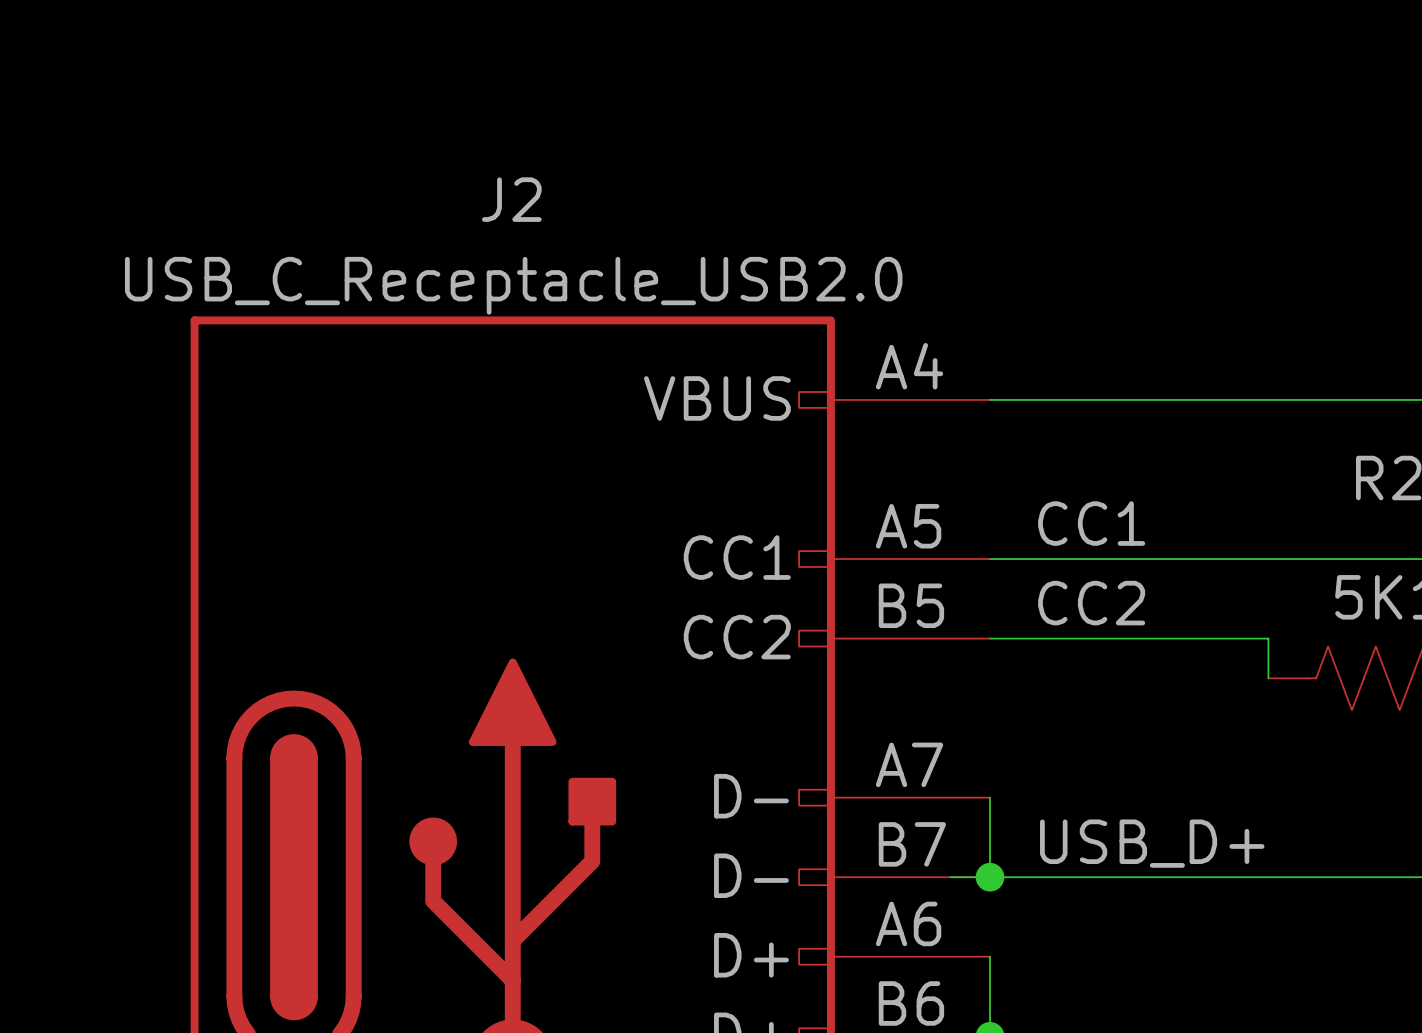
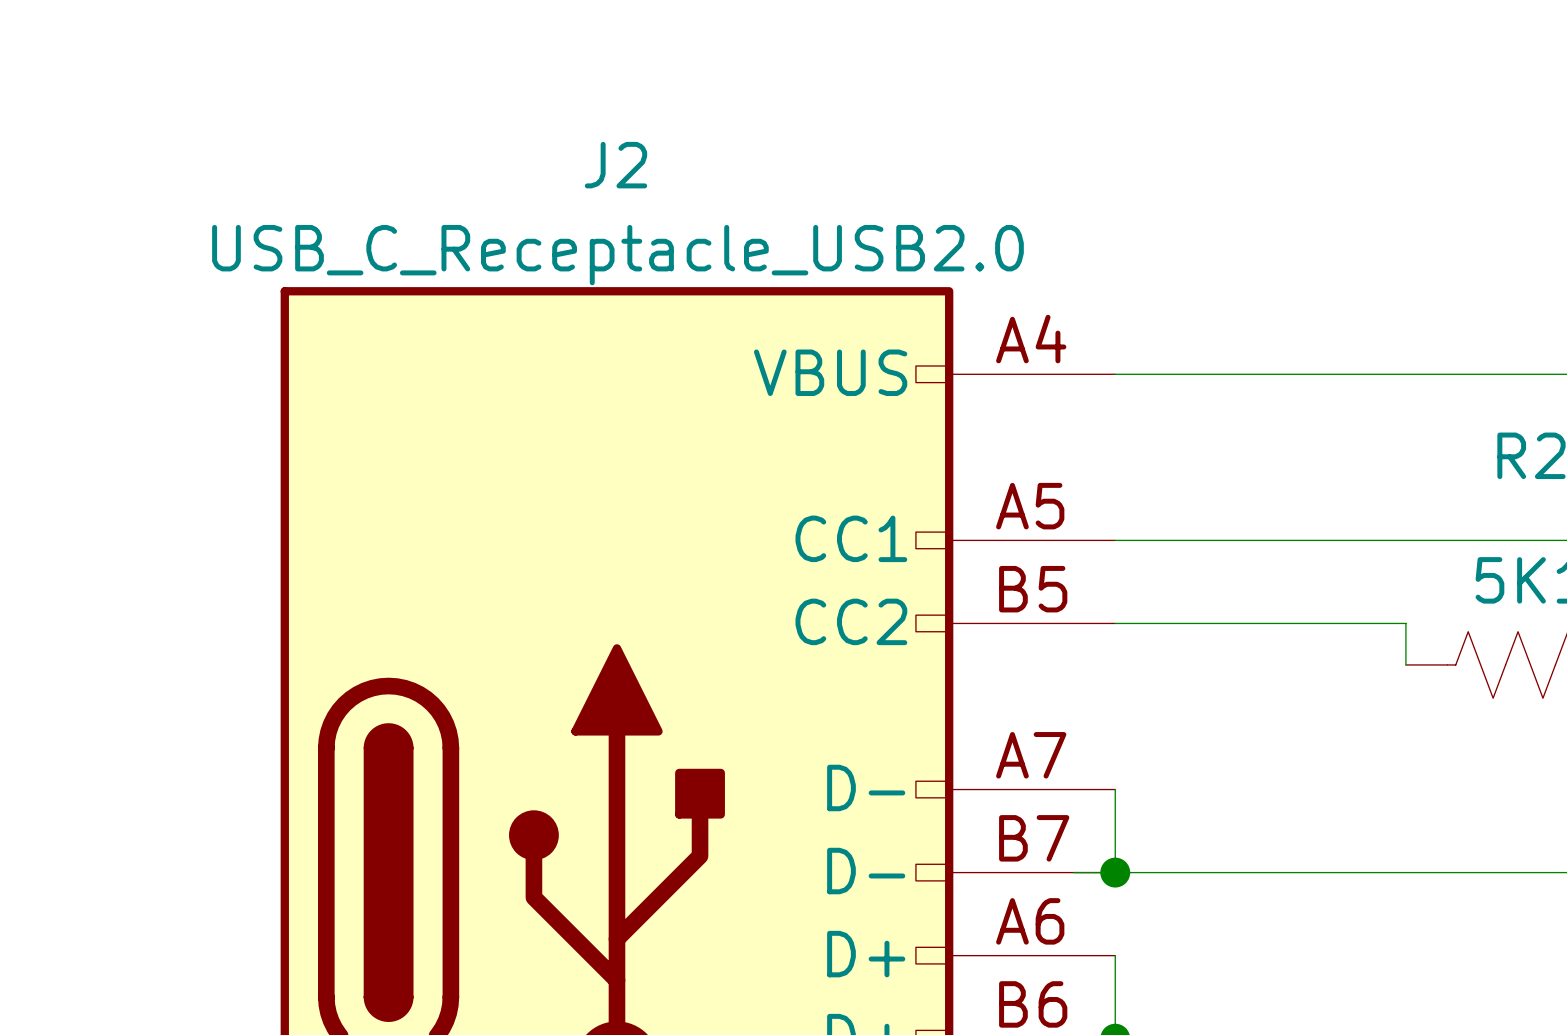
label: CC1 (1091, 523) -> none
label: CC2 (1091, 603) -> none
label: USB_D+ (1152, 843) -> none

